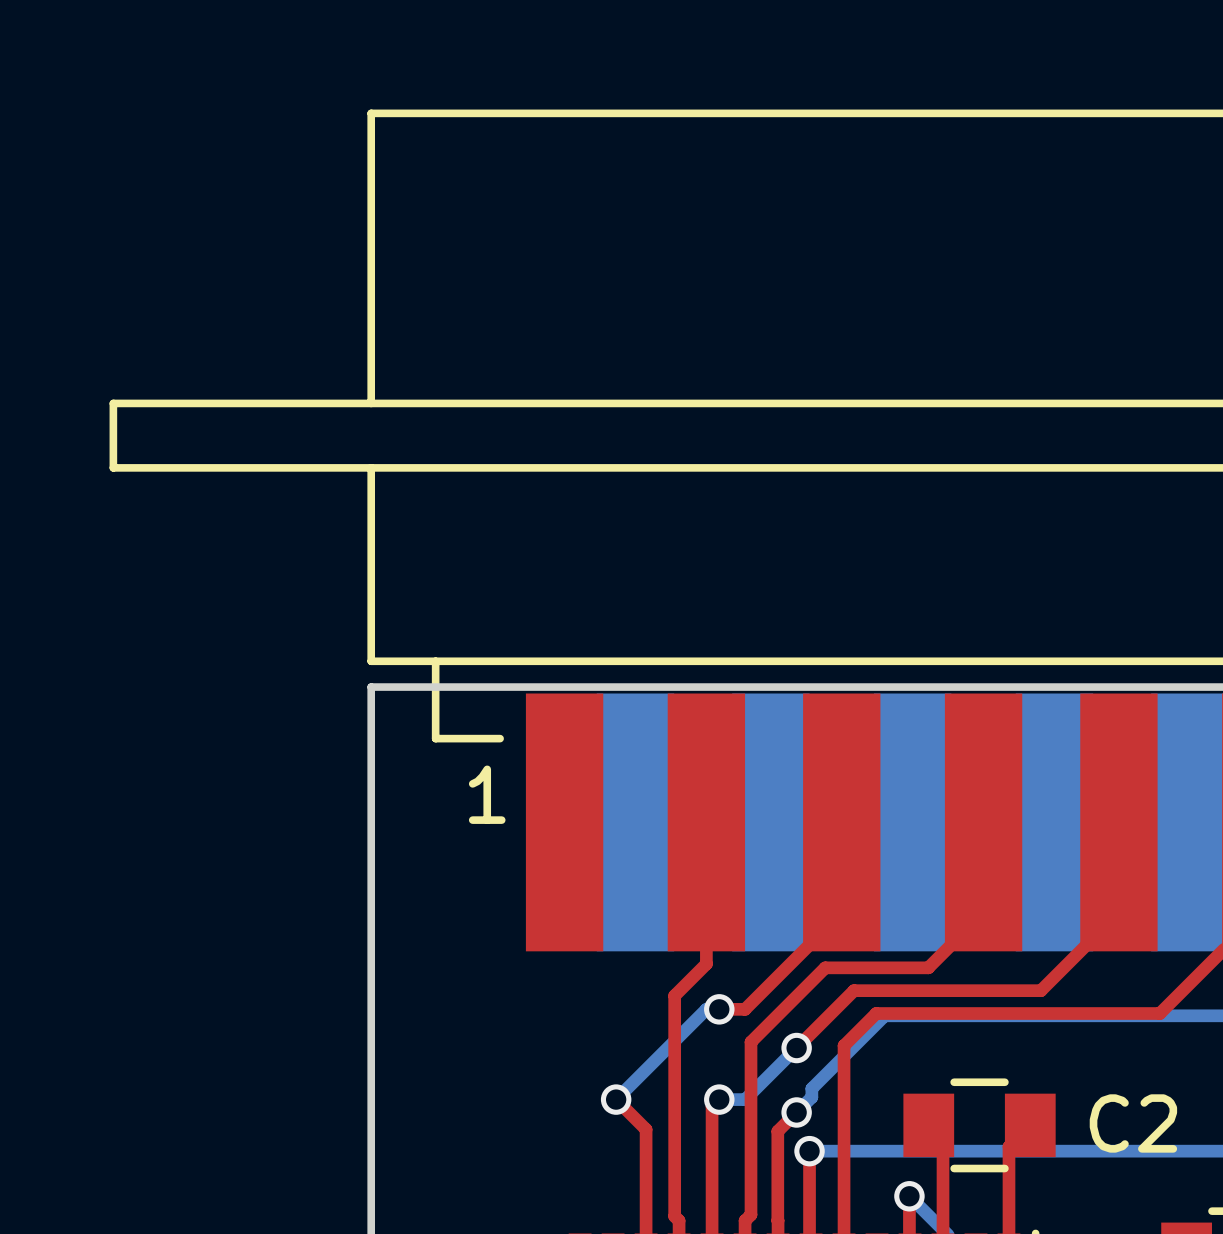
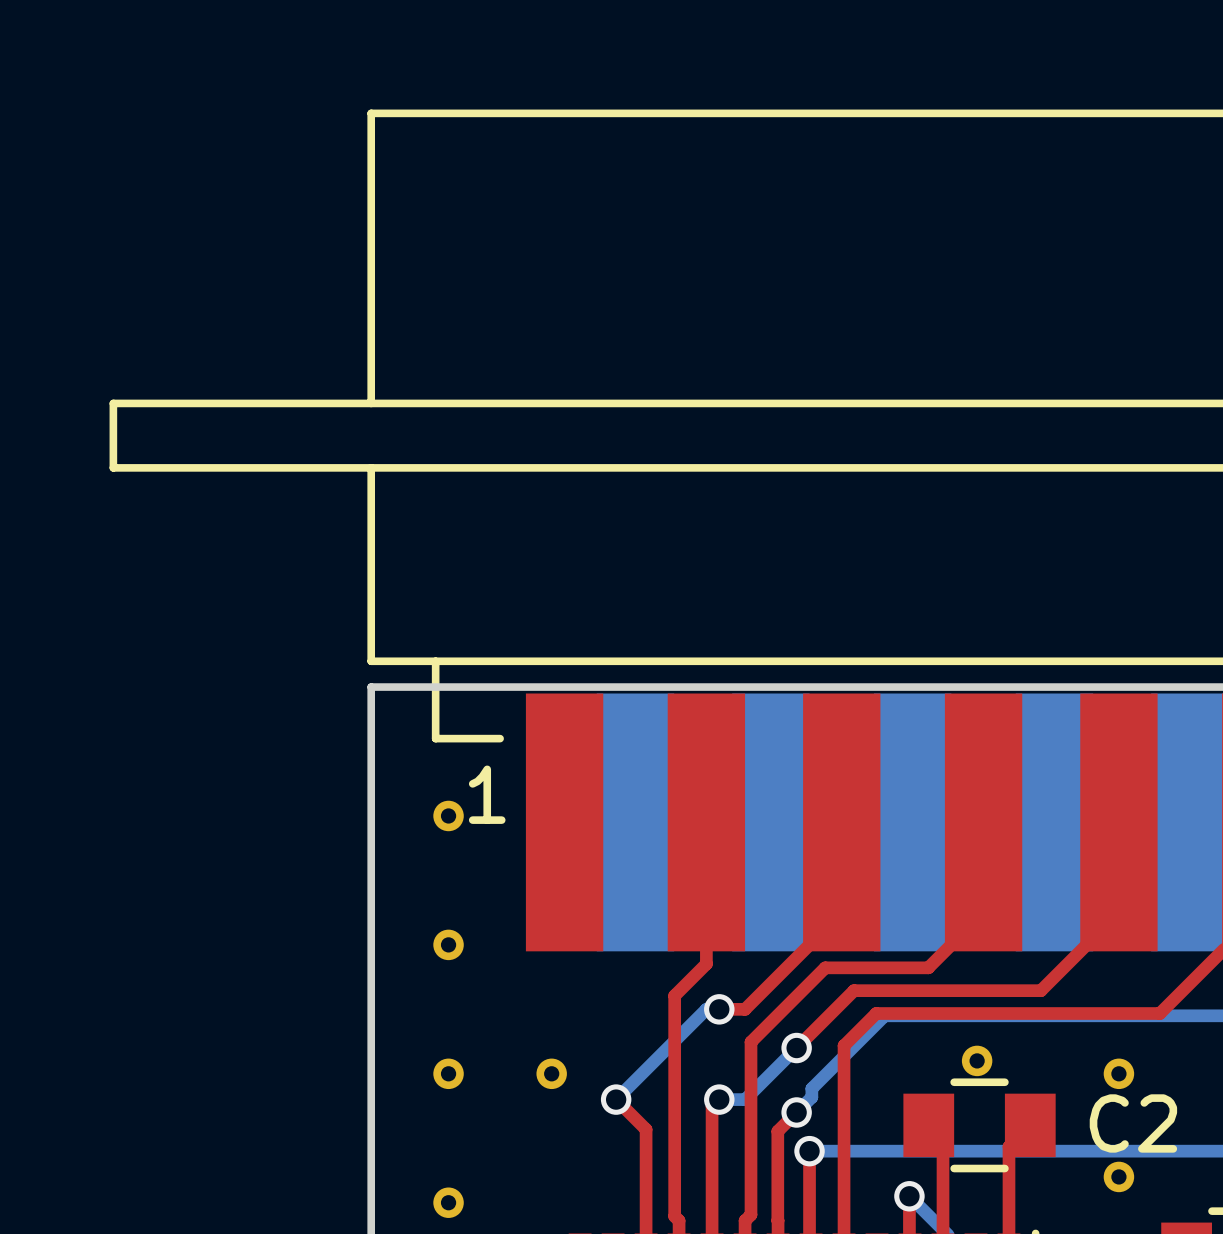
part: none -> (448, 815)
part: none -> (448, 944)
part: none -> (977, 1060)
part: none -> (448, 1073)
part: none -> (551, 1073)
part: none -> (1118, 1073)
part: none -> (1118, 1176)
part: none -> (448, 1202)

